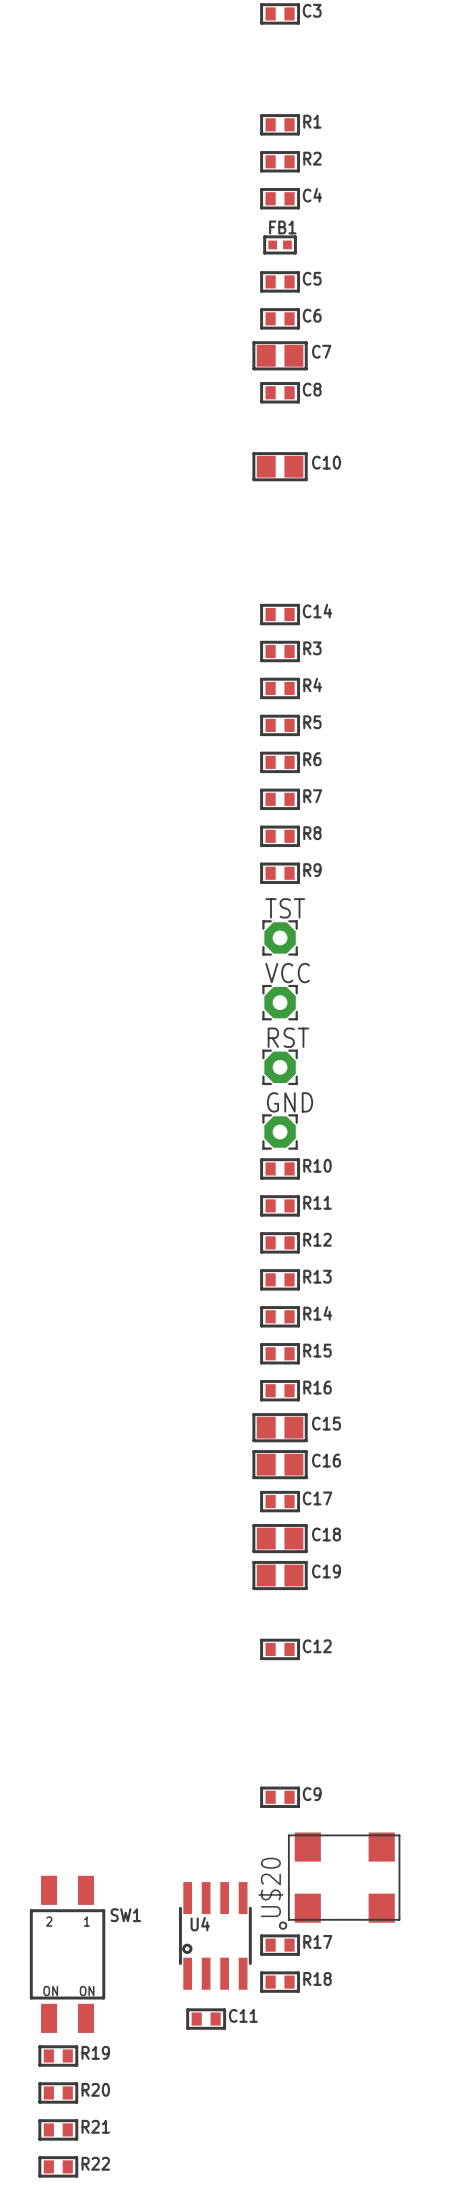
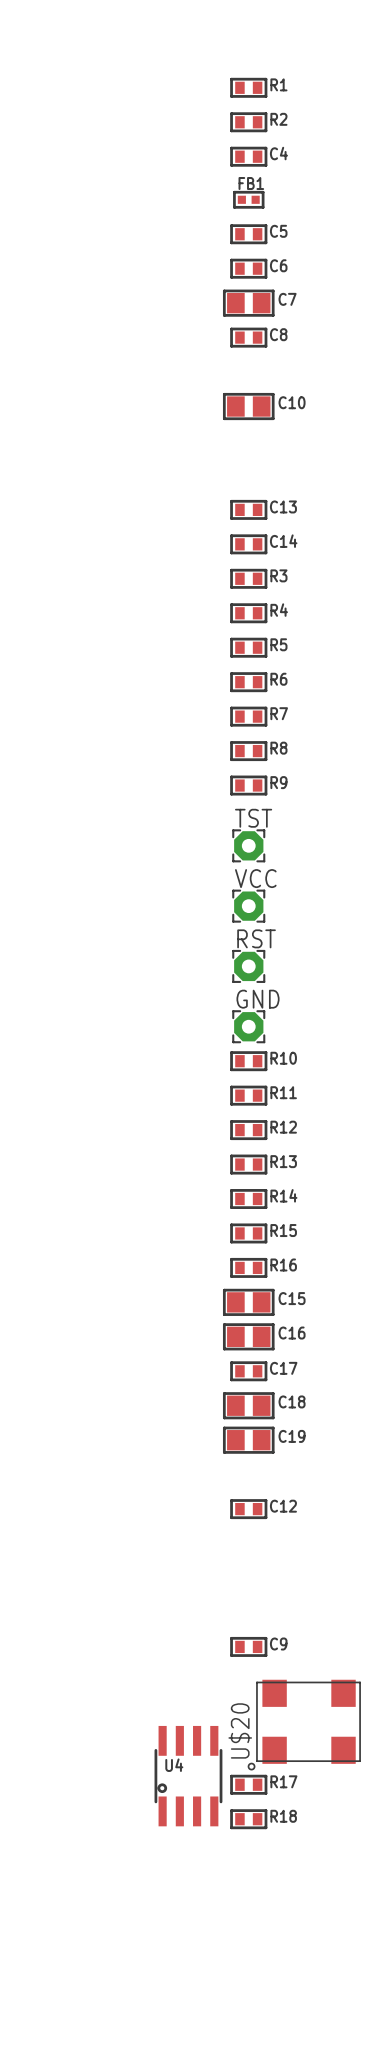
C13: none -> (248, 509)
SW1: (67, 1954) -> none
C11: (206, 2019) -> none
R19: (58, 2056) -> none
R20: (58, 2092) -> none
R21: (58, 2129) -> none
R22: (58, 2166) -> none

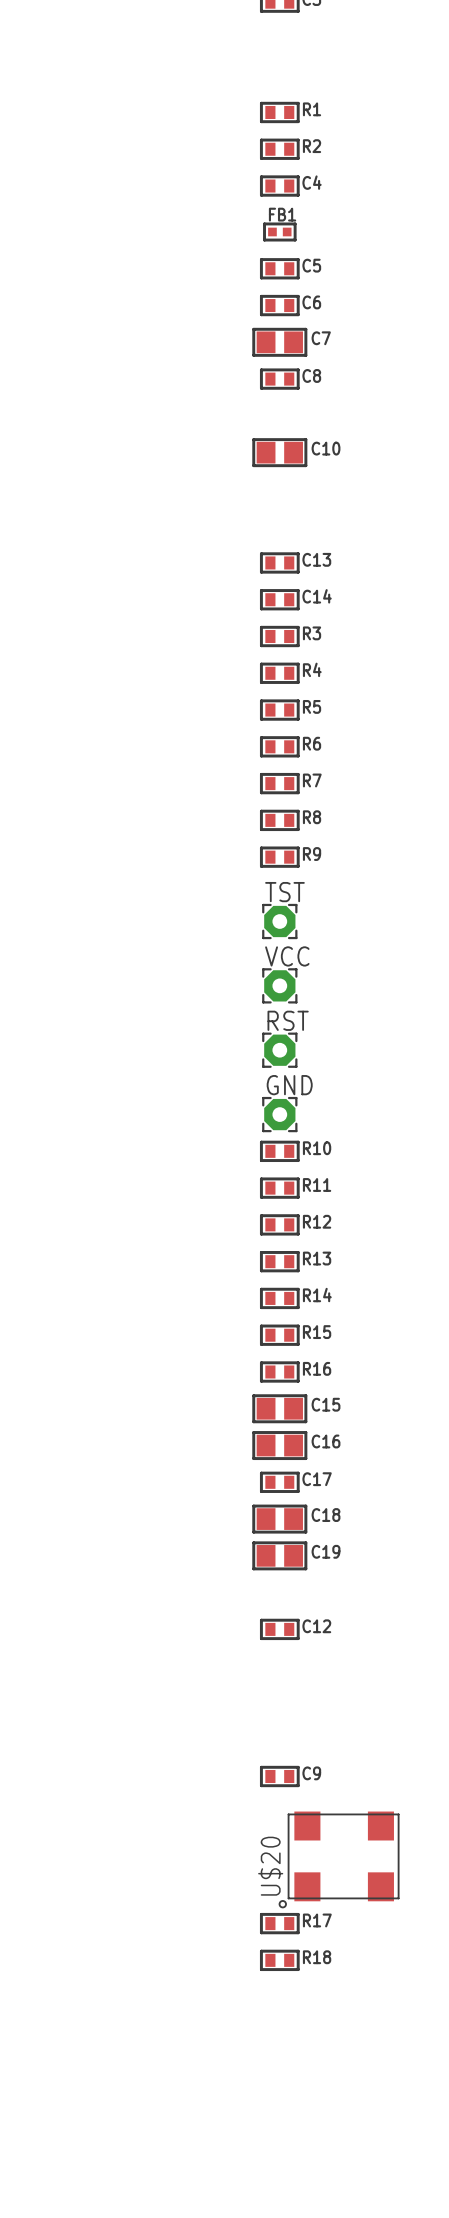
U4: (188, 1776) -> none

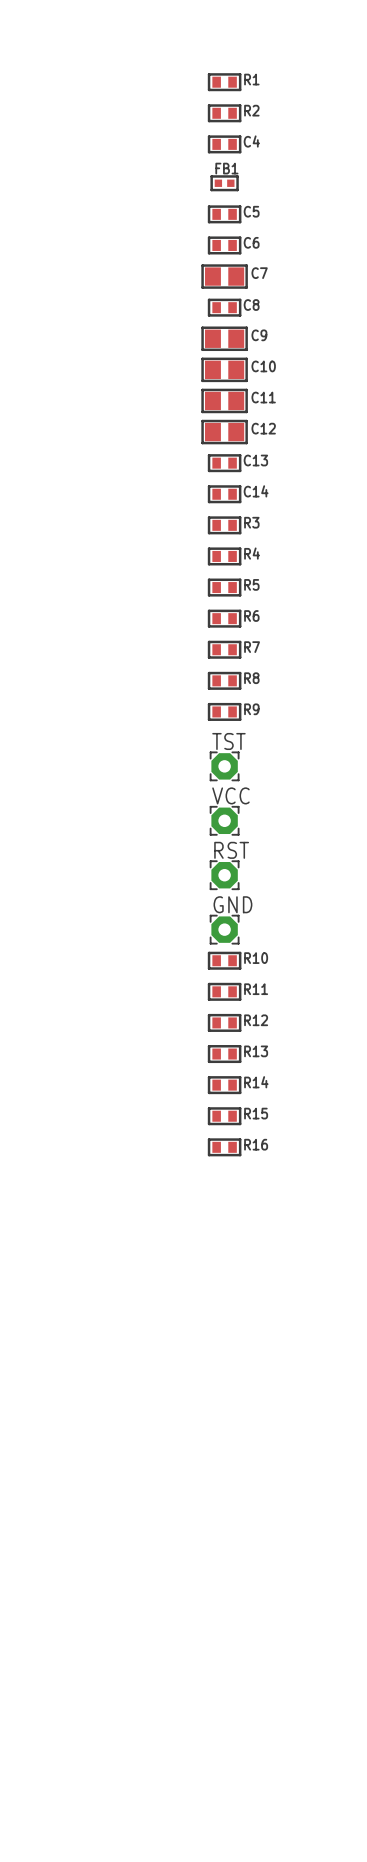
C11: none -> (224, 400)
C15: (279, 1408) -> none
C16: (279, 1445) -> none
C17: (279, 1482) -> none
C18: (279, 1519) -> none
C19: (279, 1555) -> none
C12 footprint: [259, 1618, 300, 1641] -> [201, 419, 248, 445]
C9 footprint: [259, 1765, 300, 1788] -> [201, 326, 248, 352]
U$20: (339, 1859) -> none
R17: (279, 1923) -> none
R18: (279, 1960) -> none

